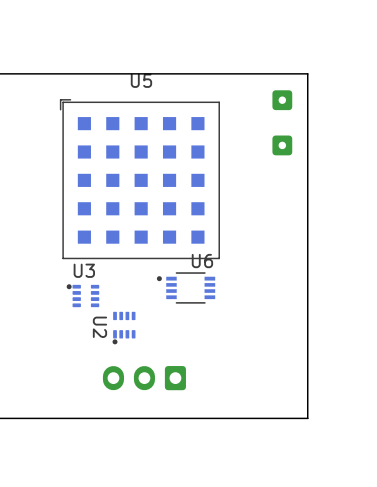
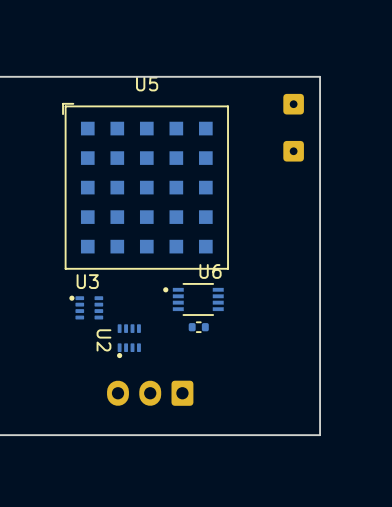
part: none -> (198, 327)

